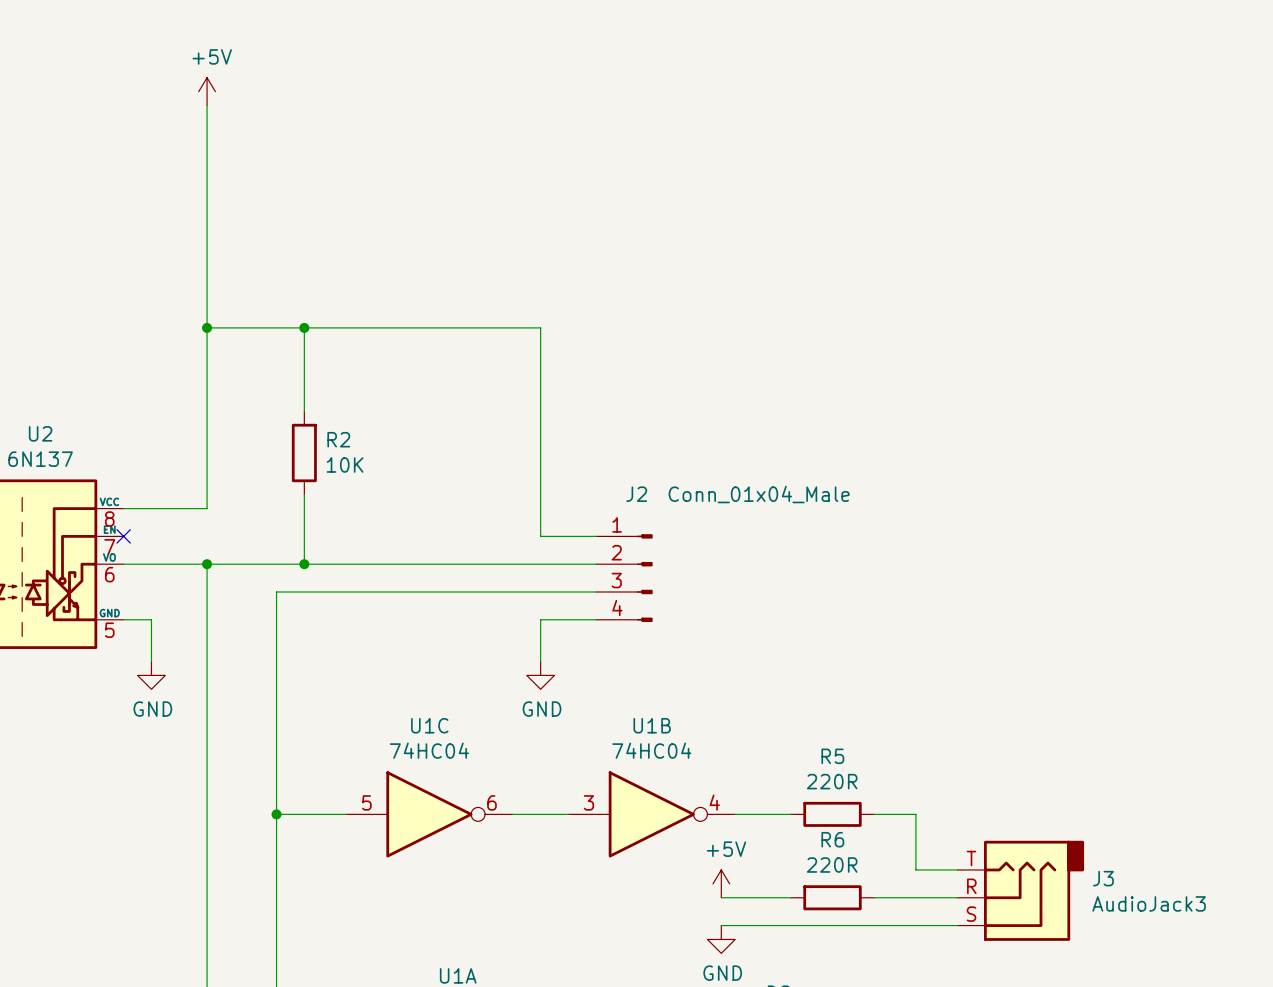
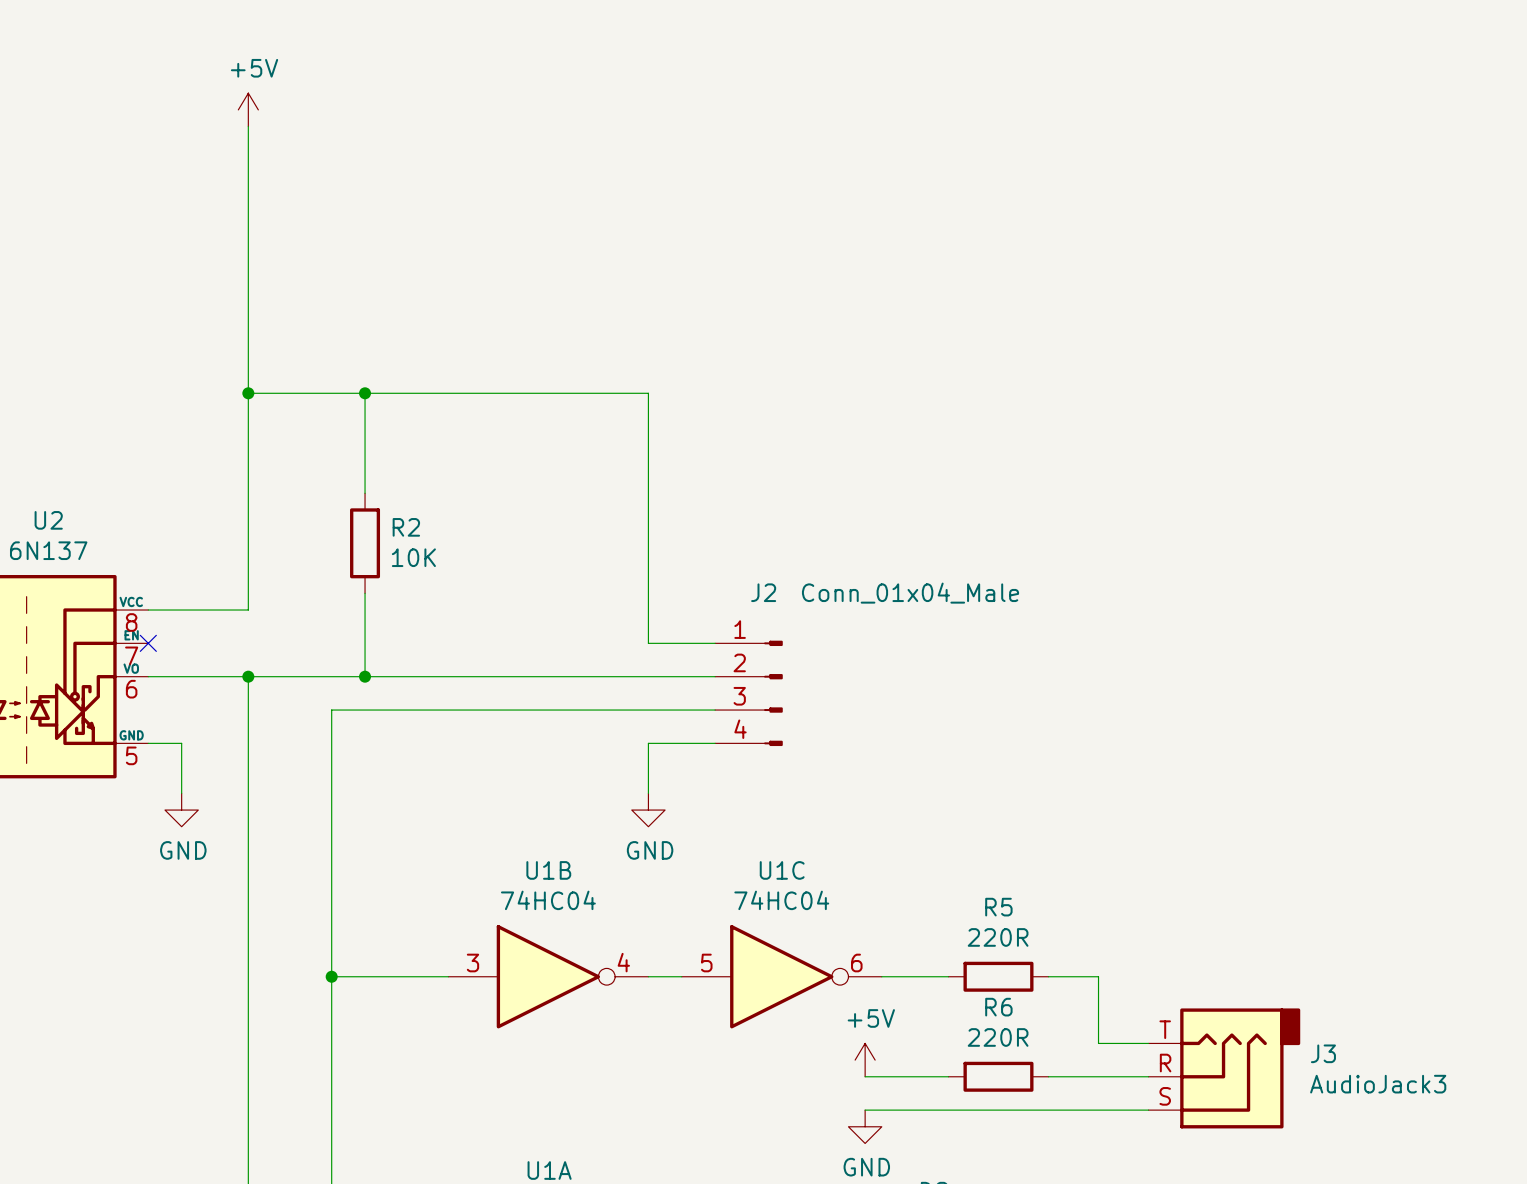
U1C position: (429, 814) -> (781, 976)
U1B position: (651, 814) -> (548, 976)

